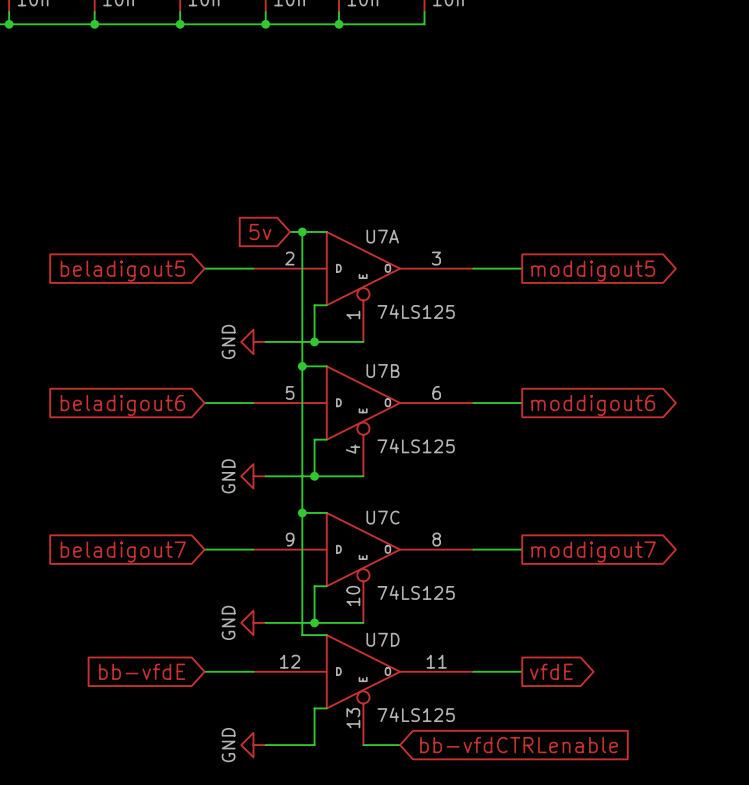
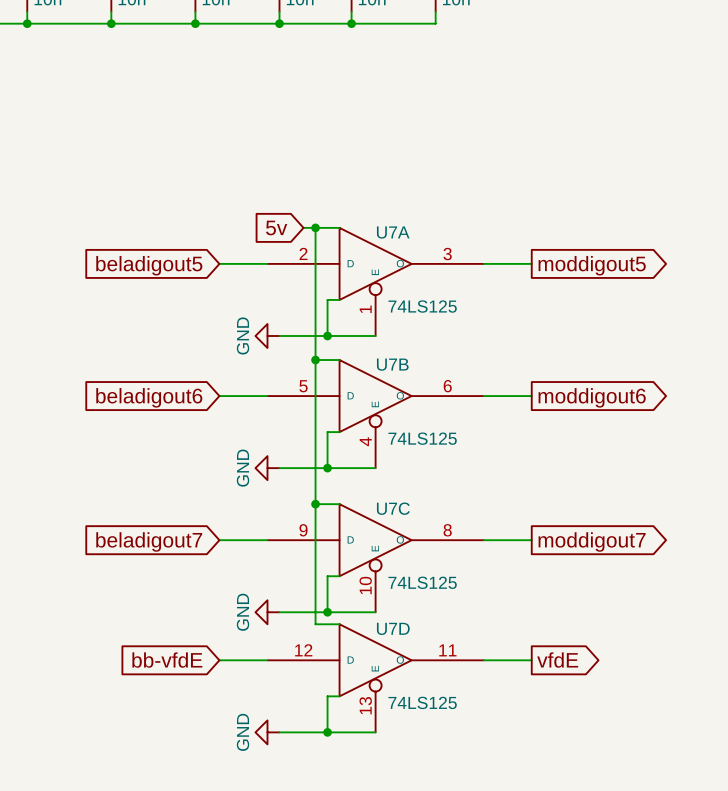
junction: none -> (327, 732)
wire: (363, 745) (400, 745) -> (375, 732) (327, 732)
global label: bb-vfdCTRLenable (519, 745) -> none

